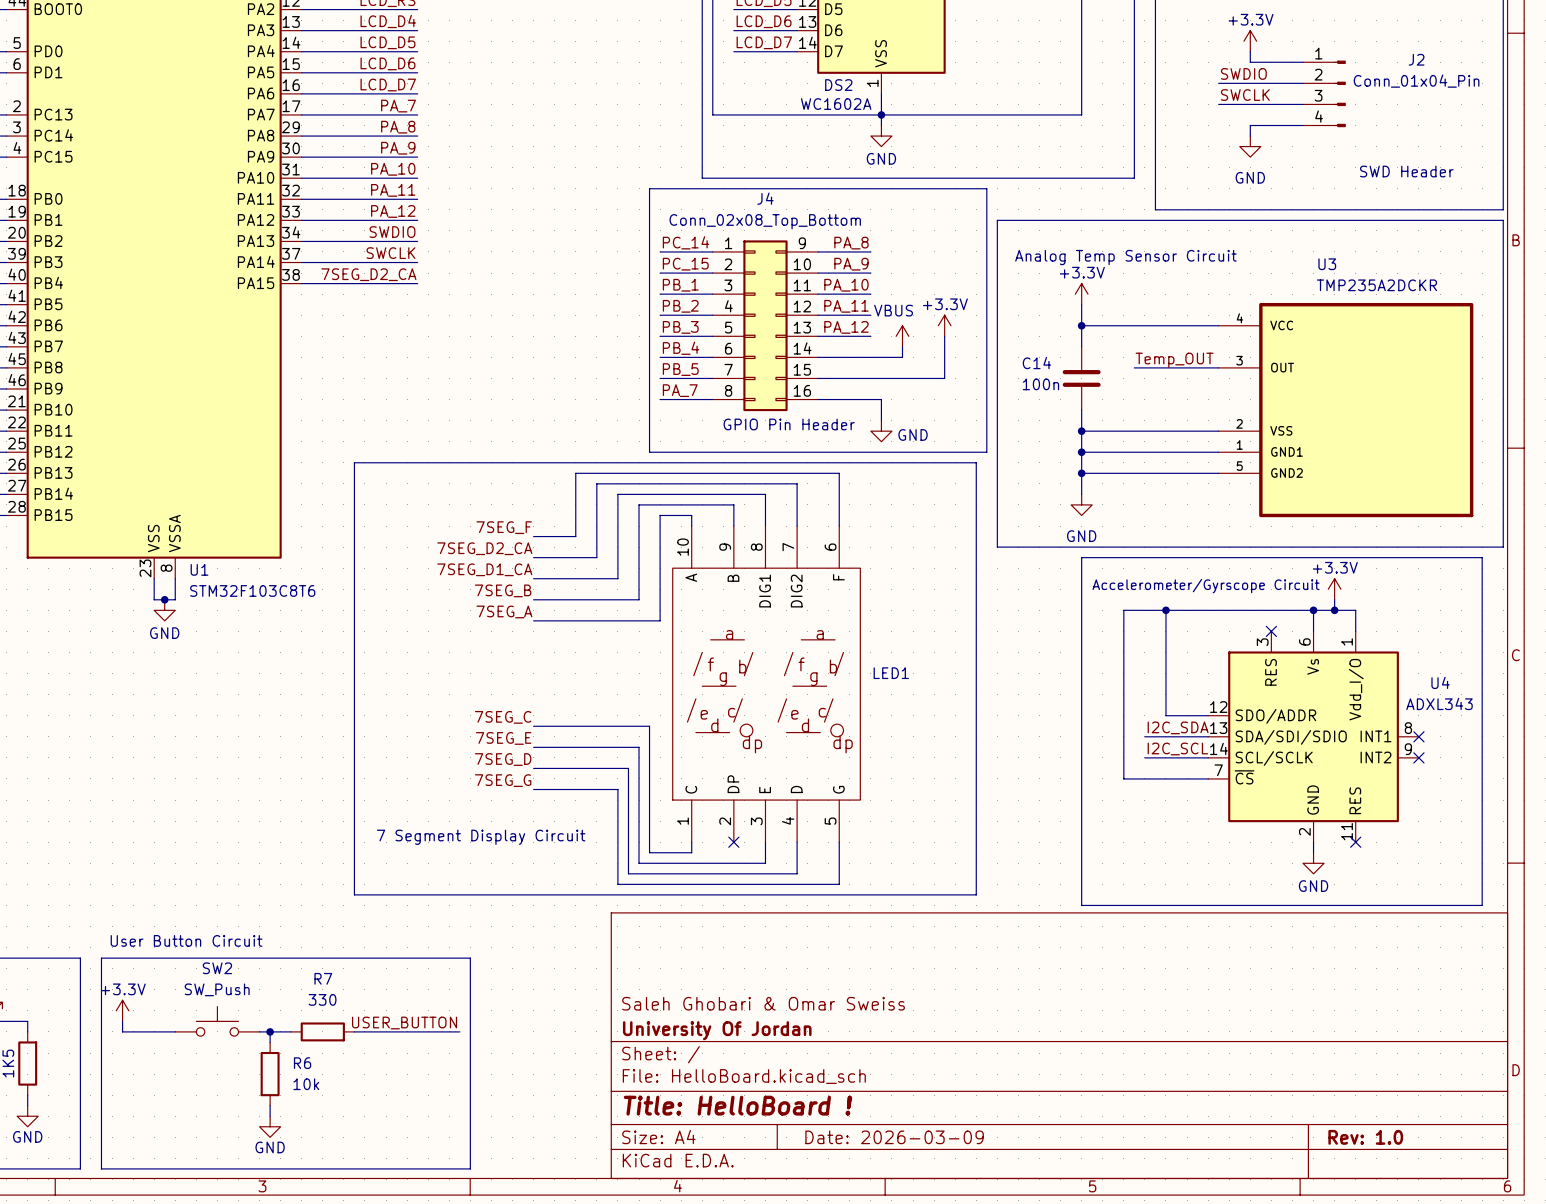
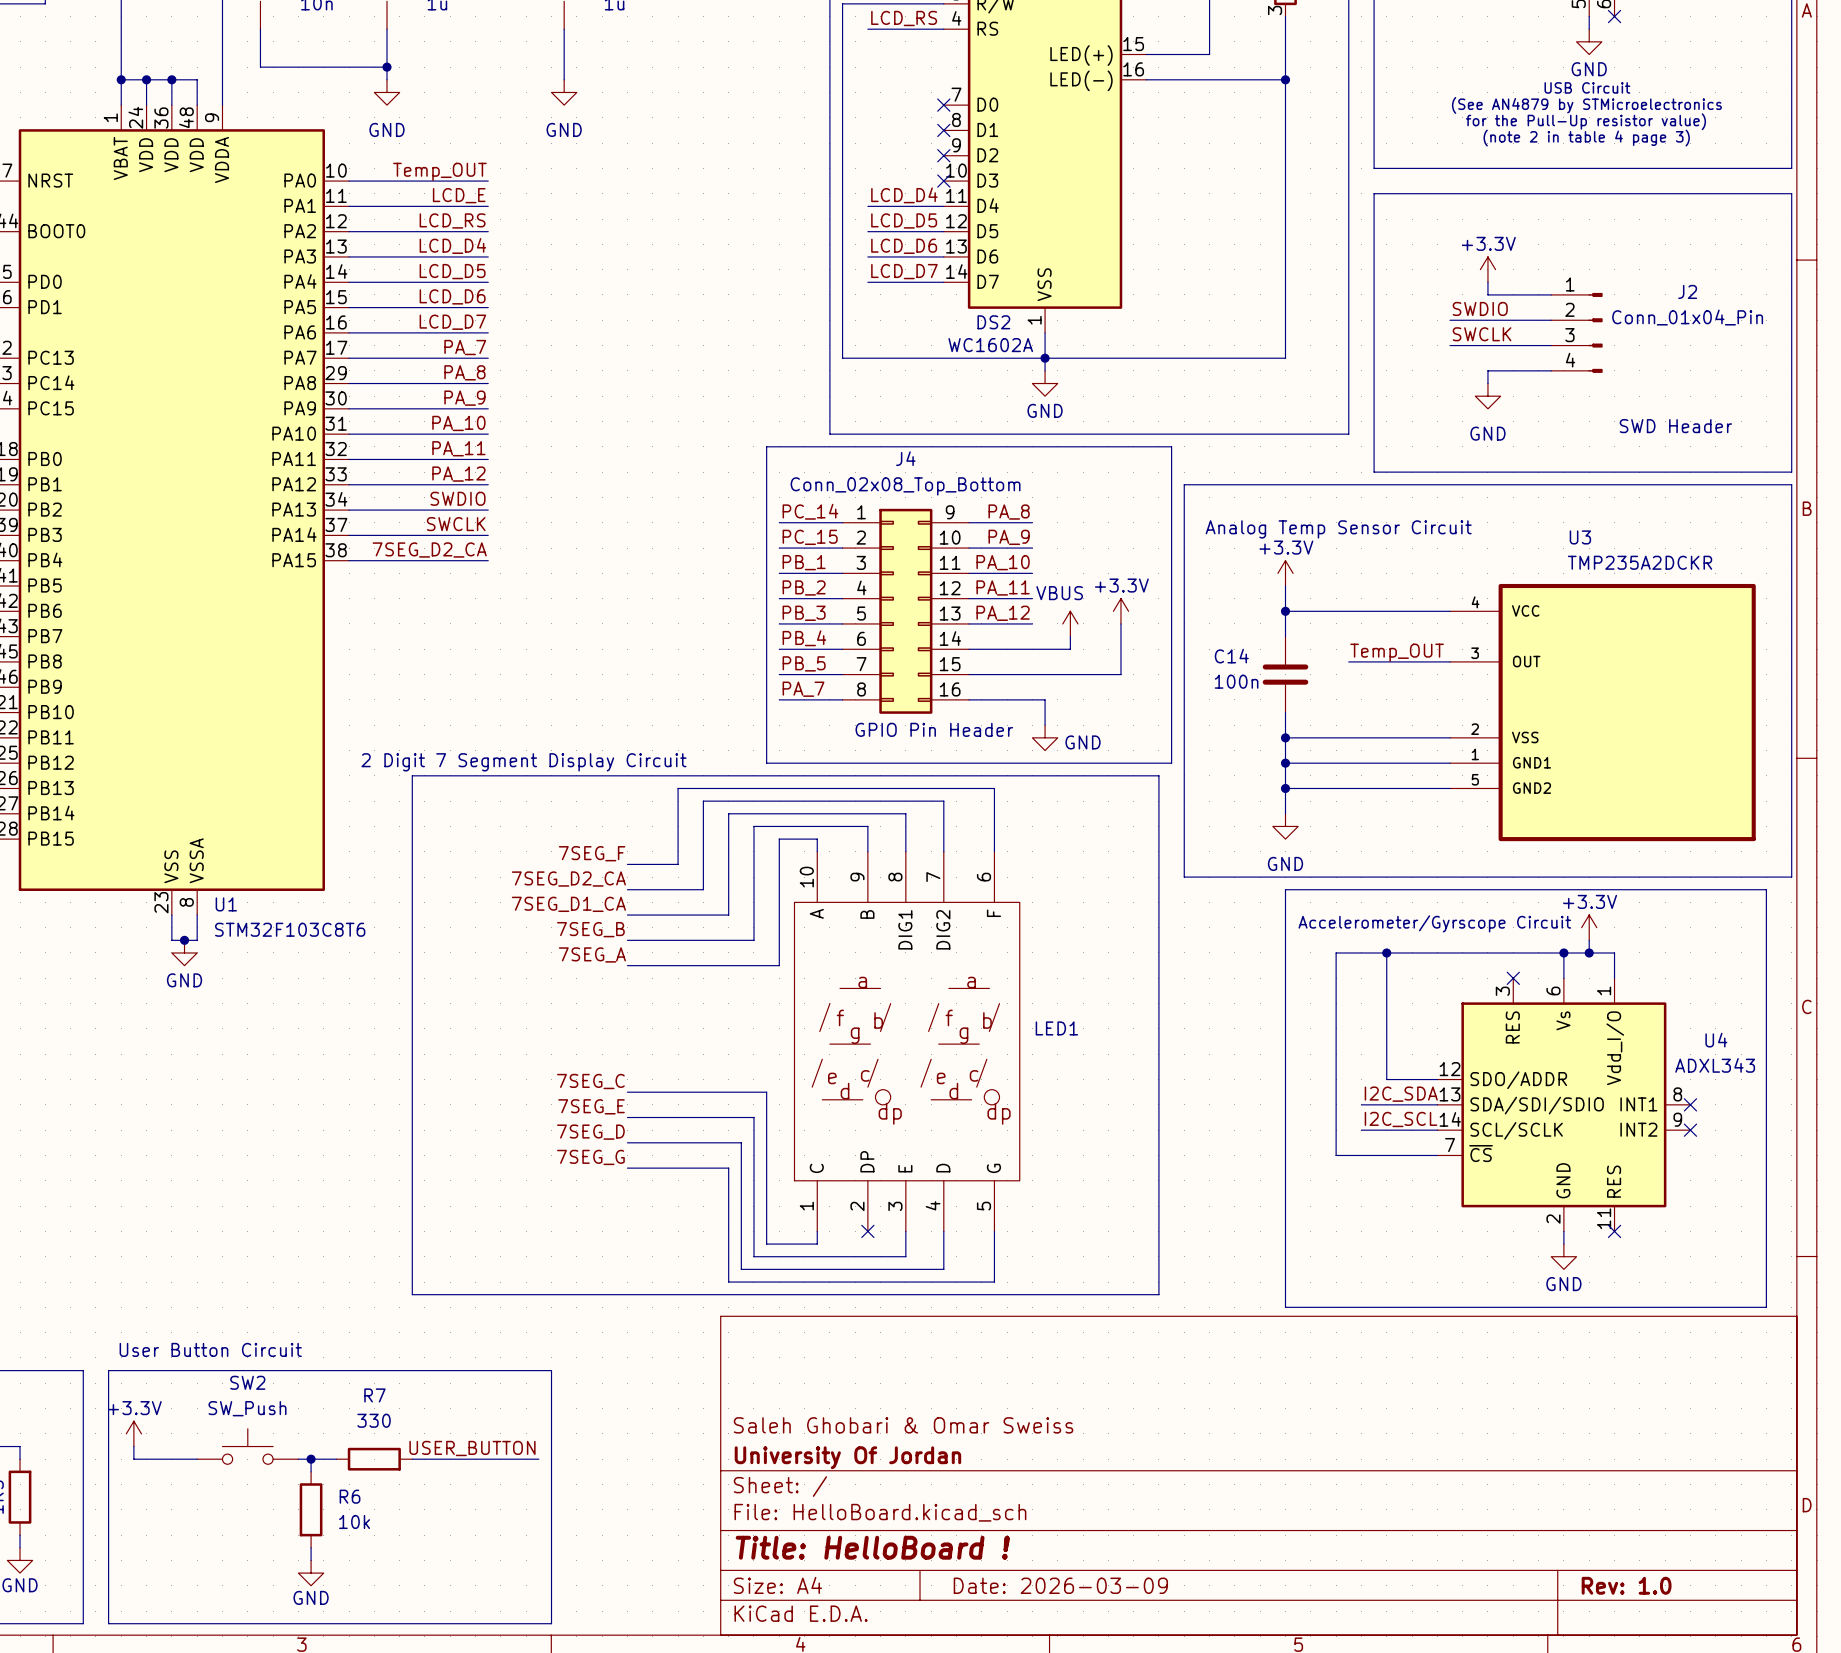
text: none -> 2 Digit 7 Segment Display Circuit (523, 762)
text: 7 Segment Display Circuit (481, 837) -> none

